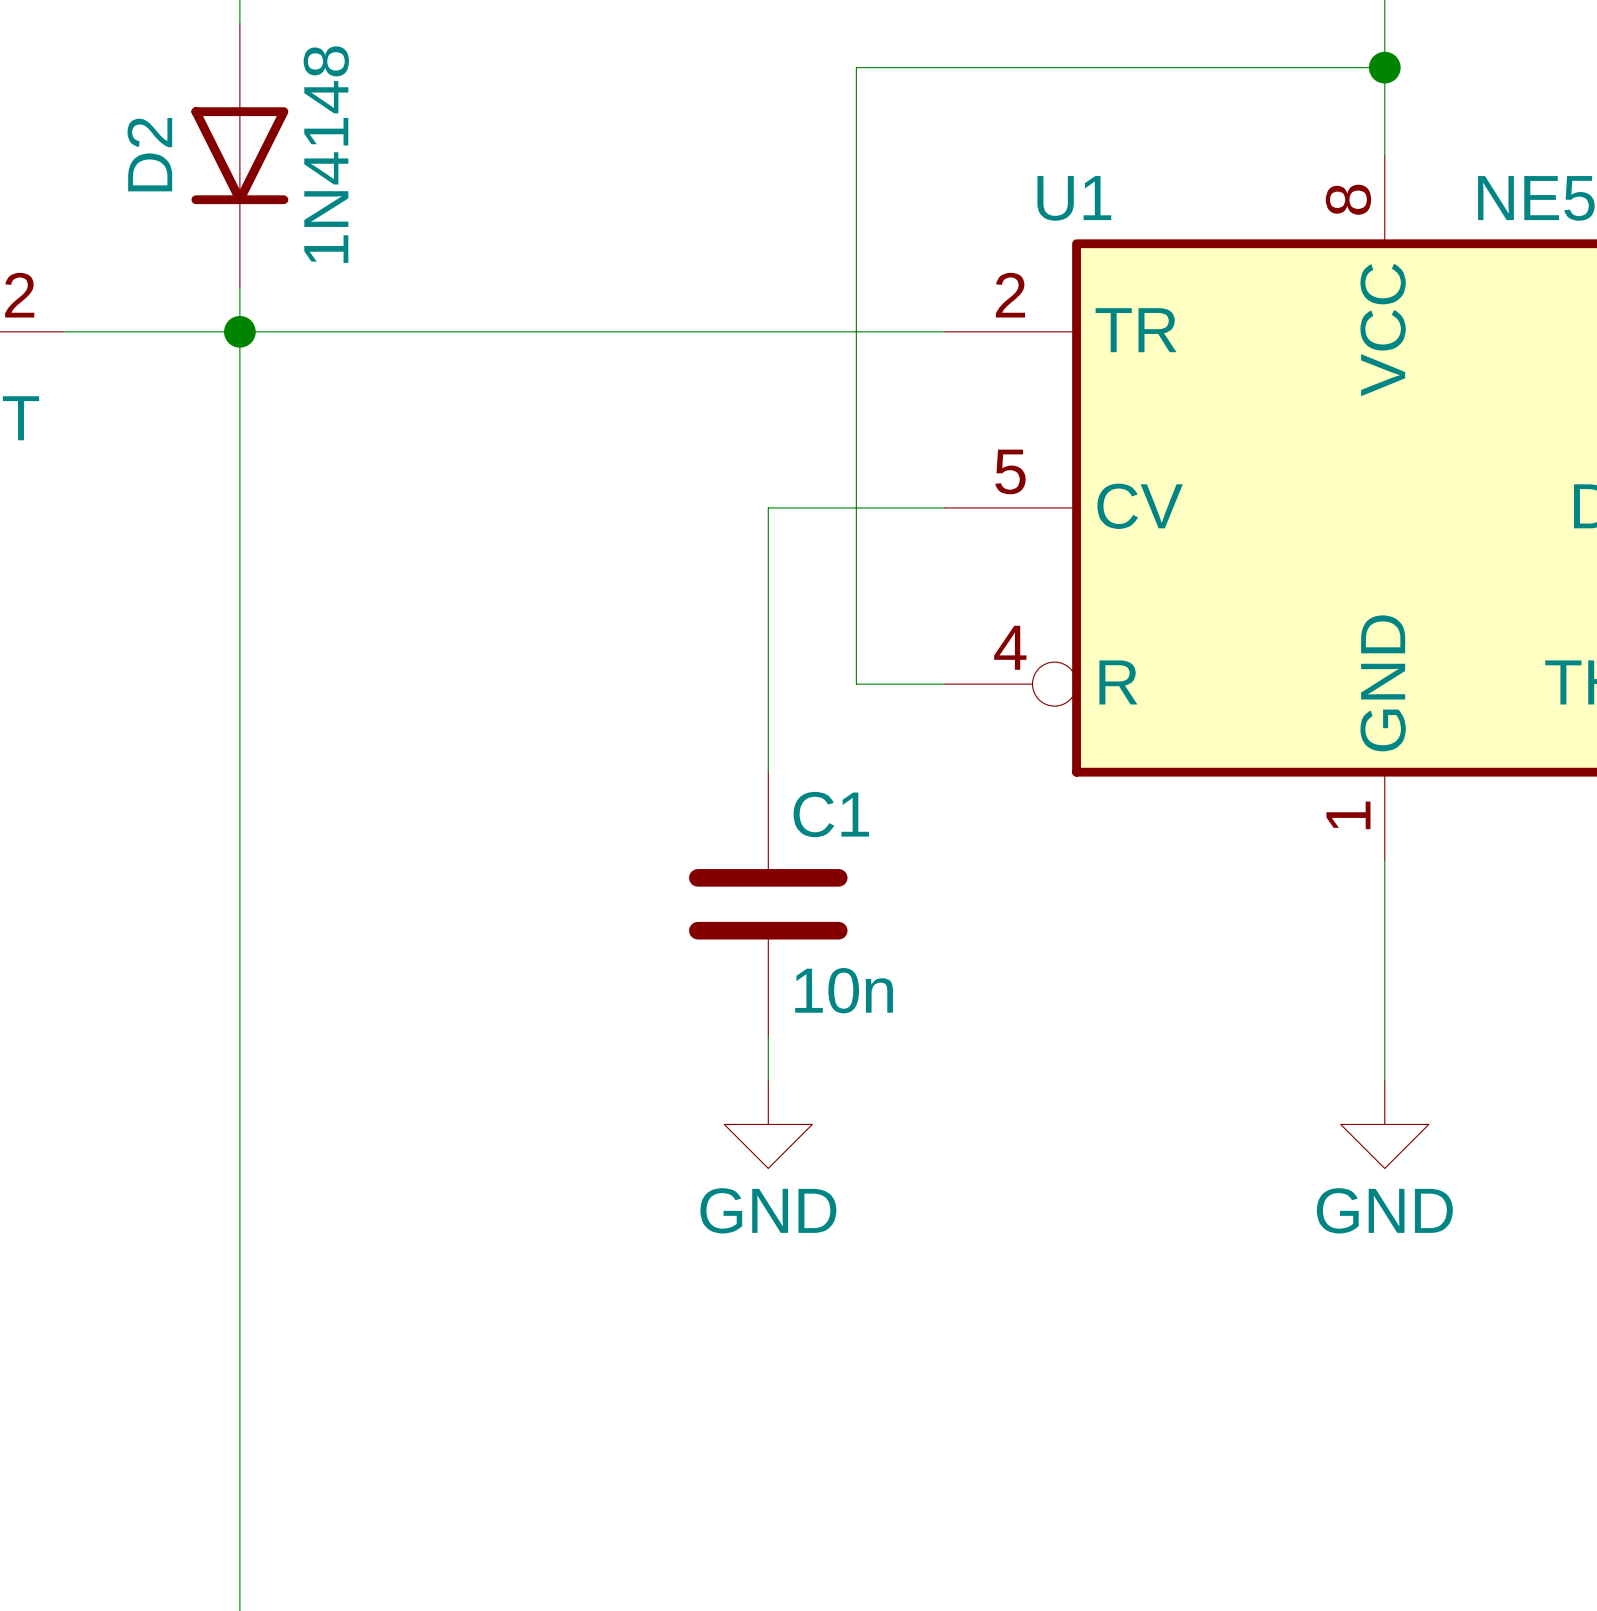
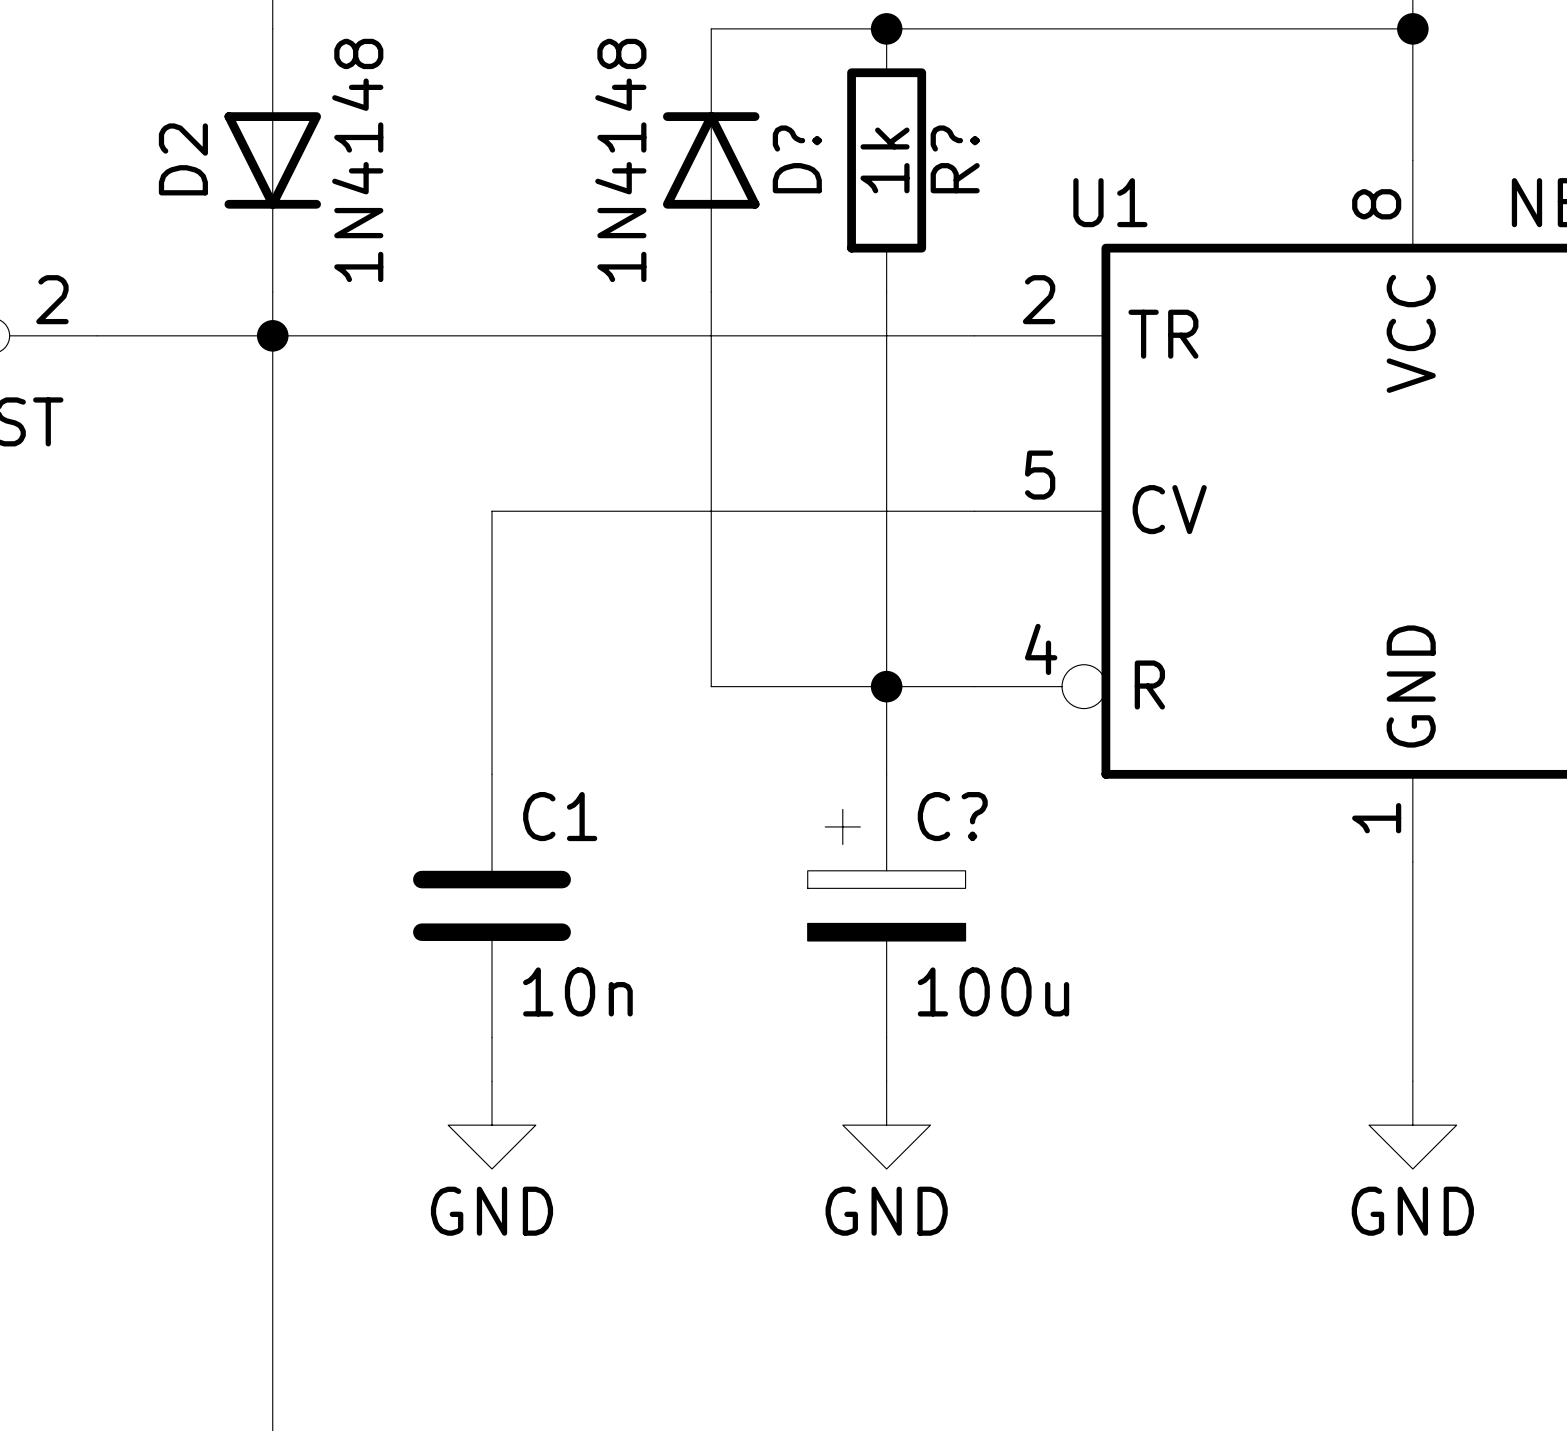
wire: none -> (711, 28) (1412, 28)
junction: none -> (886, 28)
wire: (1384, 67) (856, 67) (856, 287) -> none
junction position: (1384, 67) -> (1412, 28)
D?: none -> 1N4148 (711, 160)
R?: none -> 1k (886, 160)
wire: none -> (711, 291) (711, 686) (886, 686) (886, 774)
wire: (768, 507) (768, 772) -> (798, 511) (491, 511) (491, 774)
junction: none -> (886, 686)
C1 position: (768, 904) -> (491, 905)
C?: none -> 100u (886, 905)
wire: none -> (491, 1037) (491, 1081)
wire: (768, 1036) (768, 1080) -> (886, 1037) (886, 1081)
power symbol: none -> GND (491, 1125)
power symbol position: GND (768, 1124) -> GND (886, 1125)

